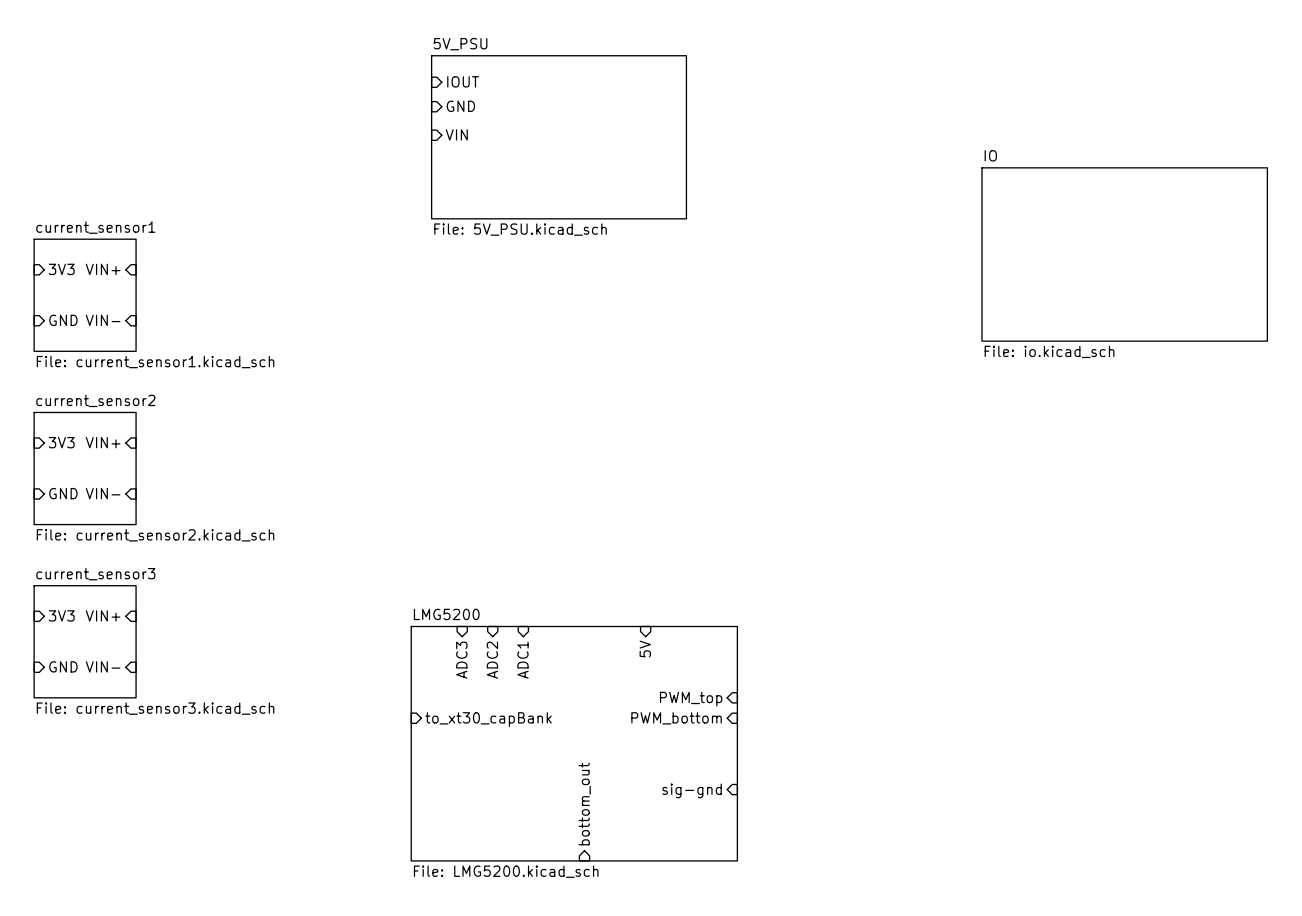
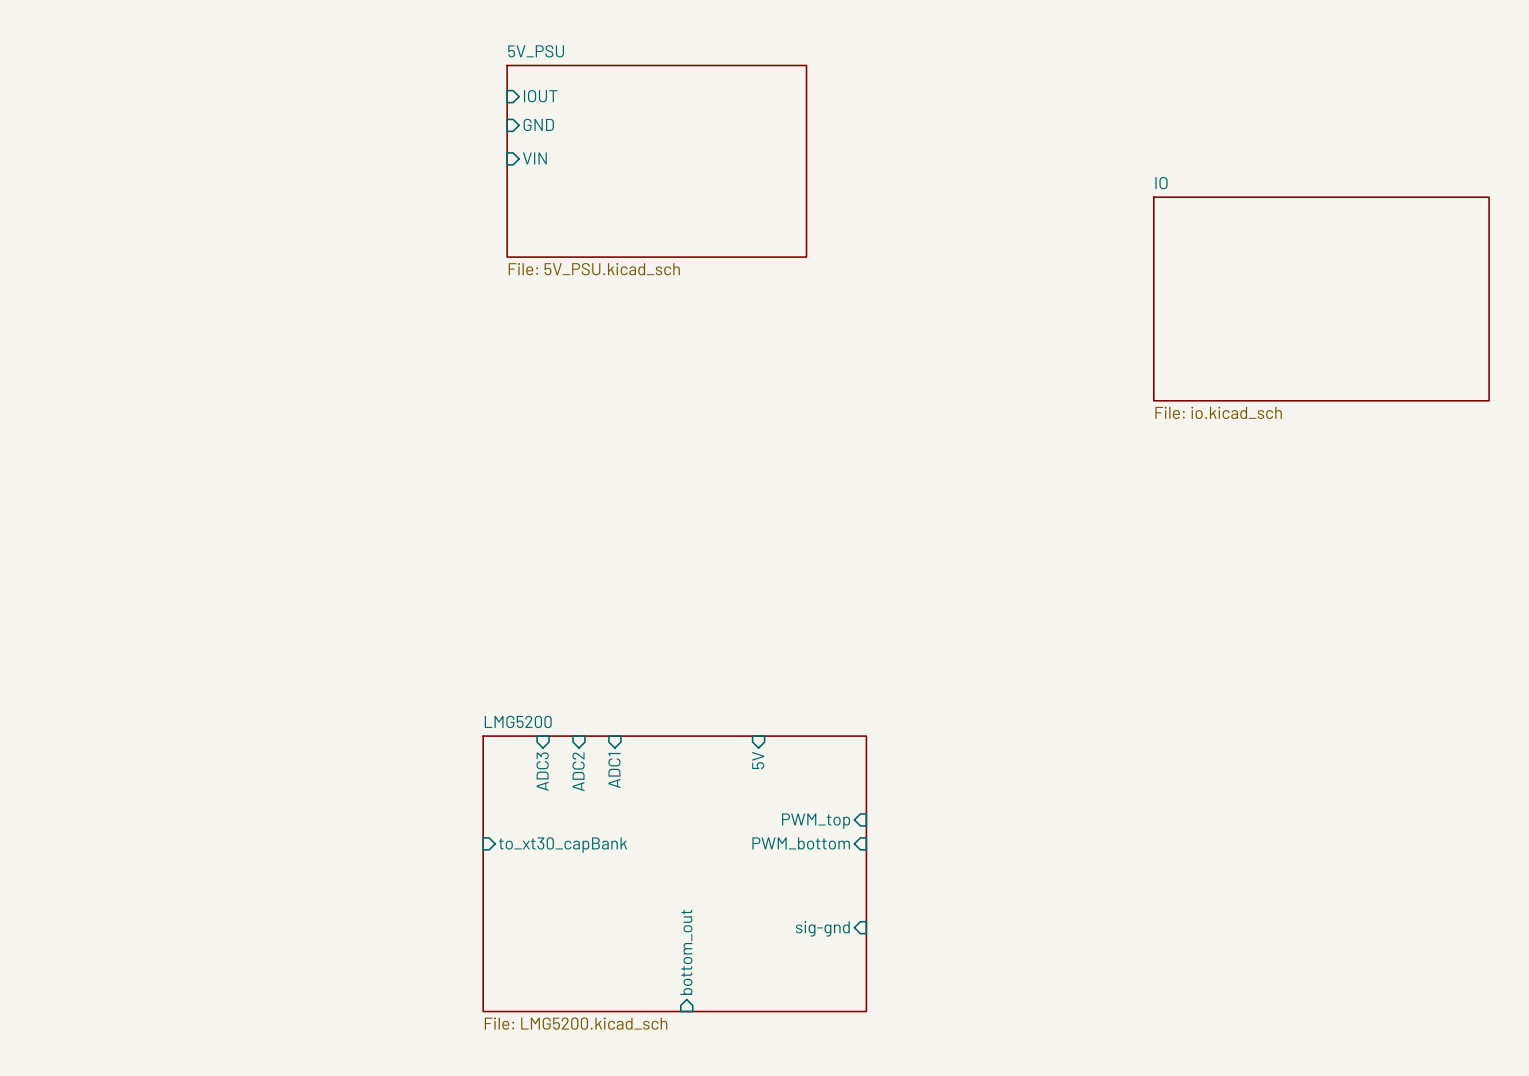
sheet pin: 3V3 (61, 269) -> none
sheet pin: VIN+ (103, 269) -> none
sheet current_sensor1: File: current_sensor1.kicad_sch (85, 295) -> none
sheet pin: GND (63, 320) -> none
sheet pin: VIN- (103, 320) -> none
sheet pin: 3V3 (61, 442) -> none
sheet pin: VIN+ (103, 442) -> none
sheet current_sensor2: File: current_sensor2.kicad_sch (85, 468) -> none
sheet pin: GND (63, 493) -> none
sheet pin: VIN- (103, 493) -> none
sheet pin: 3V3 (61, 615) -> none
sheet pin: VIN+ (103, 615) -> none
sheet current_sensor3: File: current_sensor3.kicad_sch (85, 641) -> none
sheet pin: GND (63, 666) -> none
sheet pin: VIN- (103, 666) -> none

